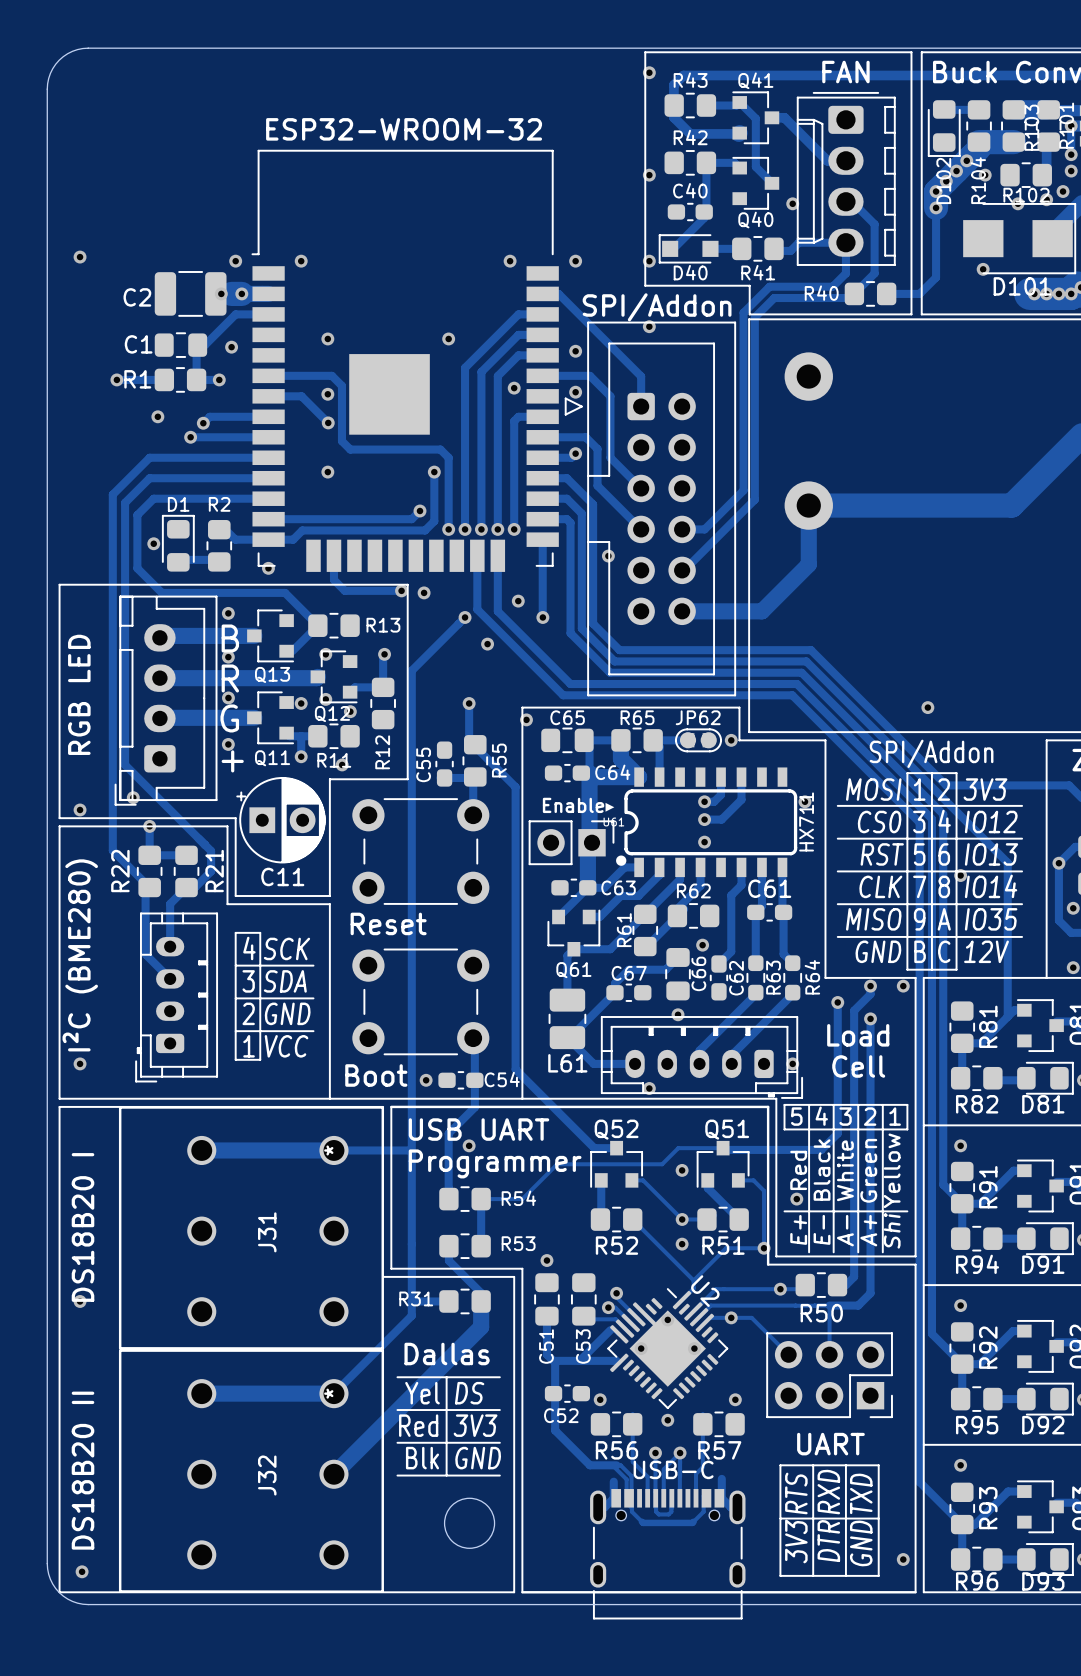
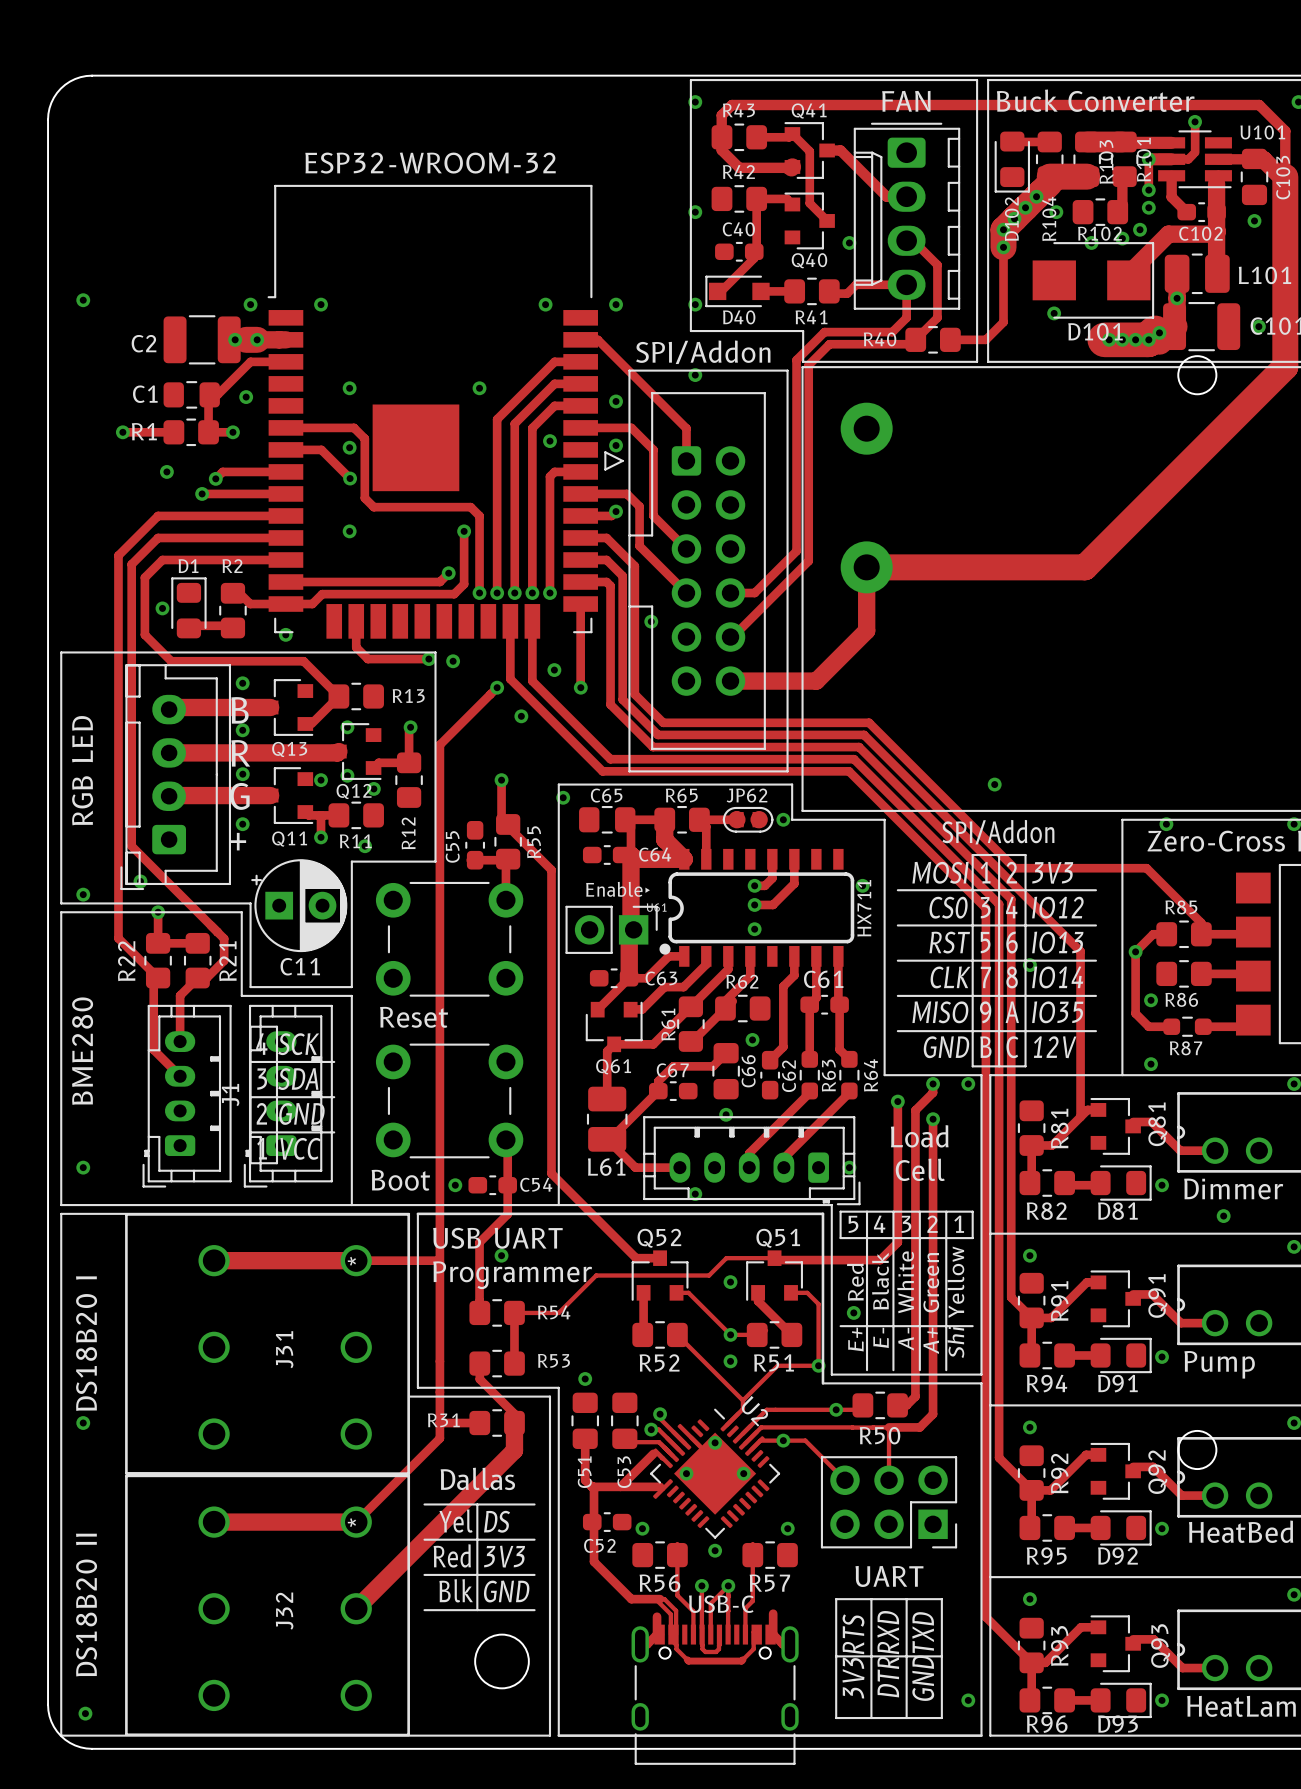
part value: I²C (BME280) (80, 955) -> BME280 (82, 1051)
J1: none -> (288, 1096)

